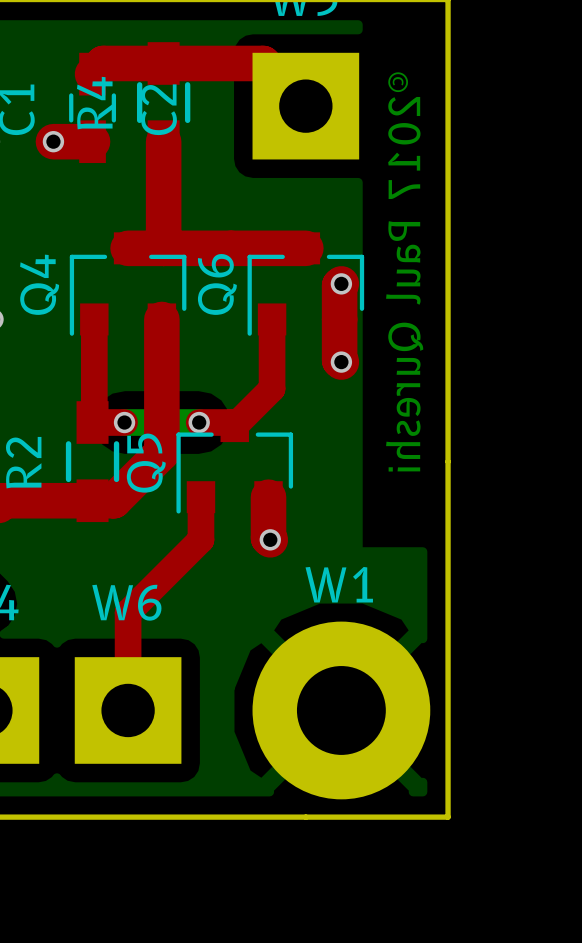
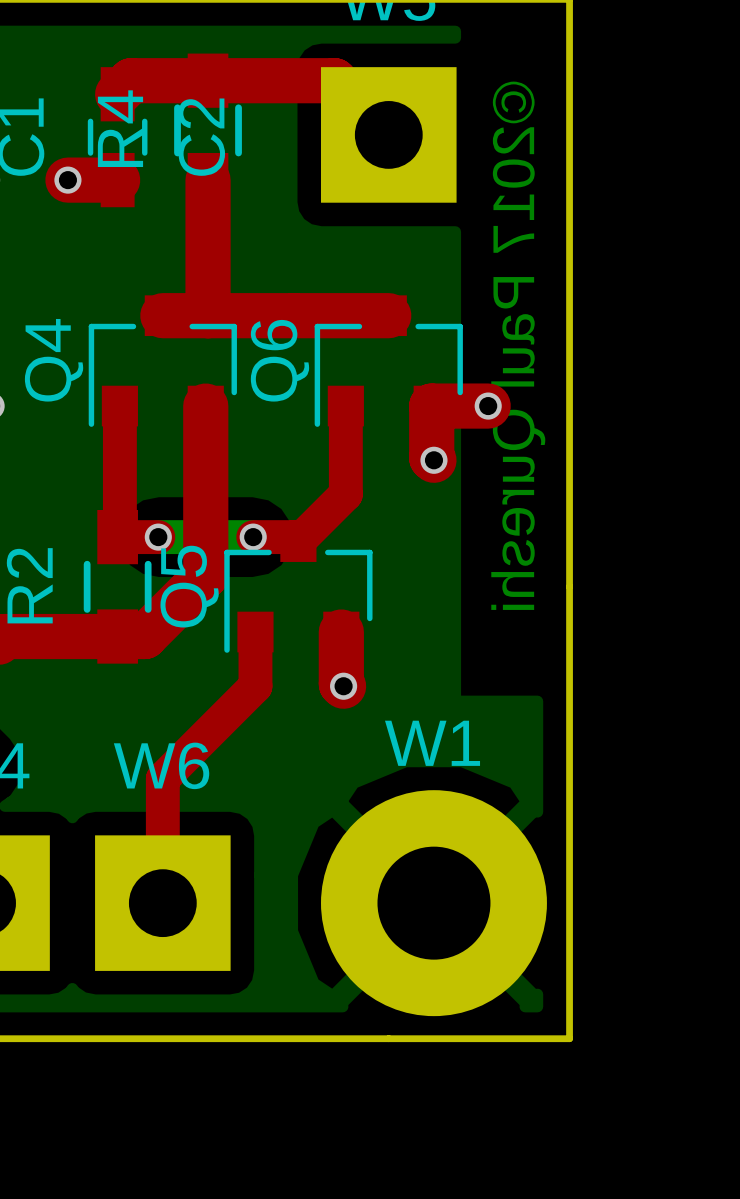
top track: (341, 283) (339, 285) (339, 319) -> (488, 406) (431, 406)
via position: (341, 283) -> (488, 406)

